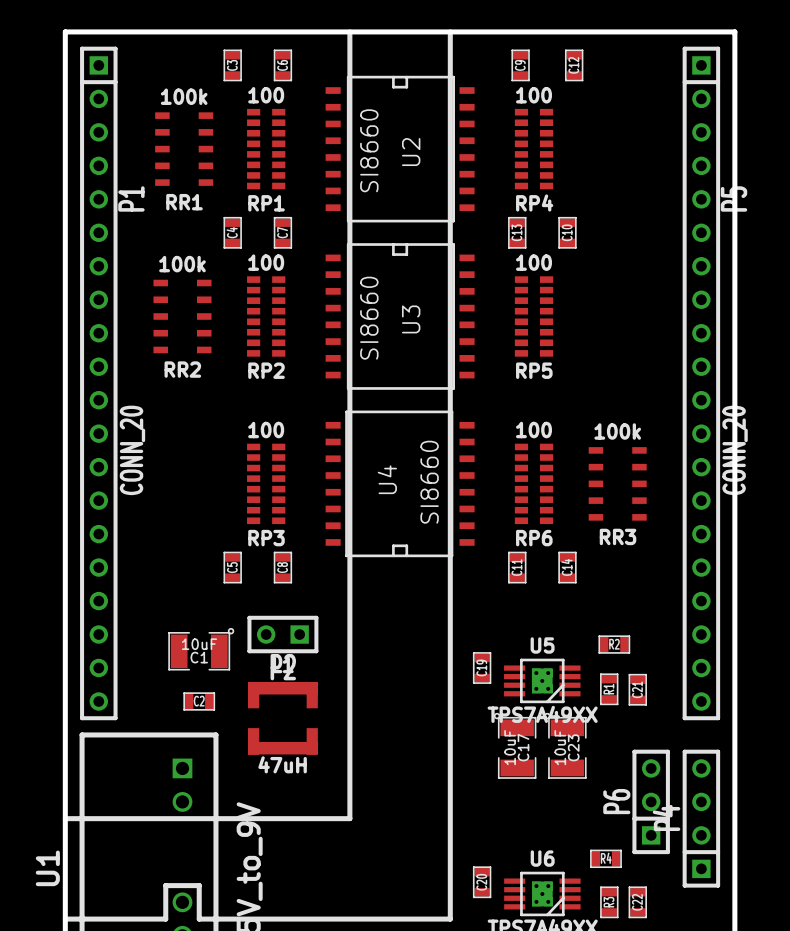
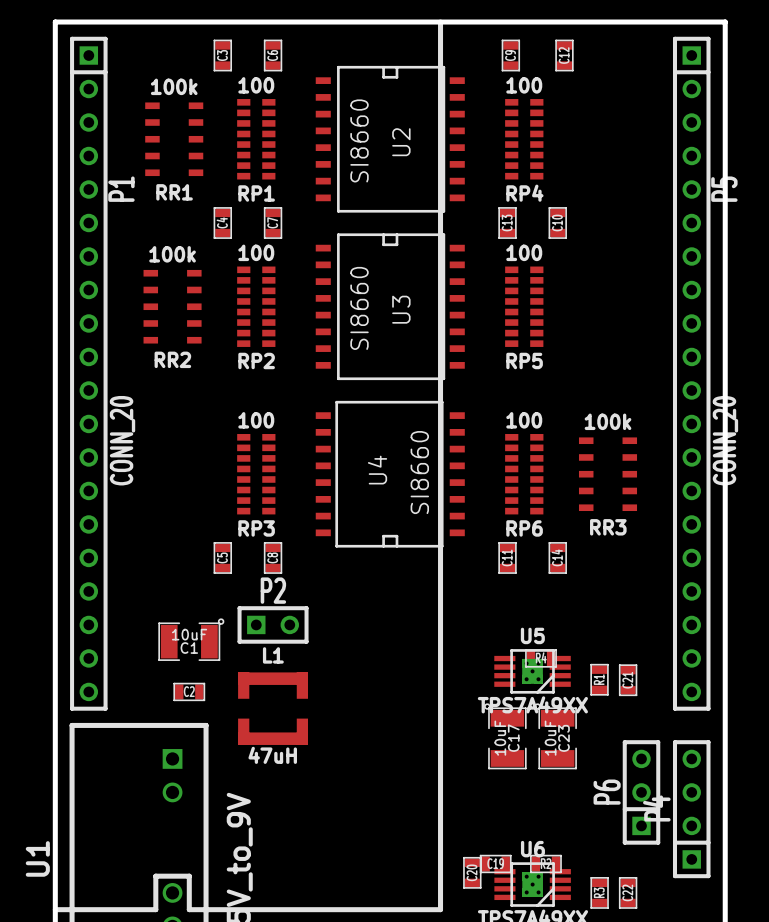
line: (349, 31) (349, 818) (65, 818) -> none
P2 rotation: 0° (282, 634) -> 180° (273, 624)
R2 position: (614, 644) -> (545, 863)
C19 rotation: 0° (482, 668) -> 90° clockwise (495, 863)
C19 position: (482, 668) -> (495, 863)
R4 position: (605, 858) -> (541, 658)

